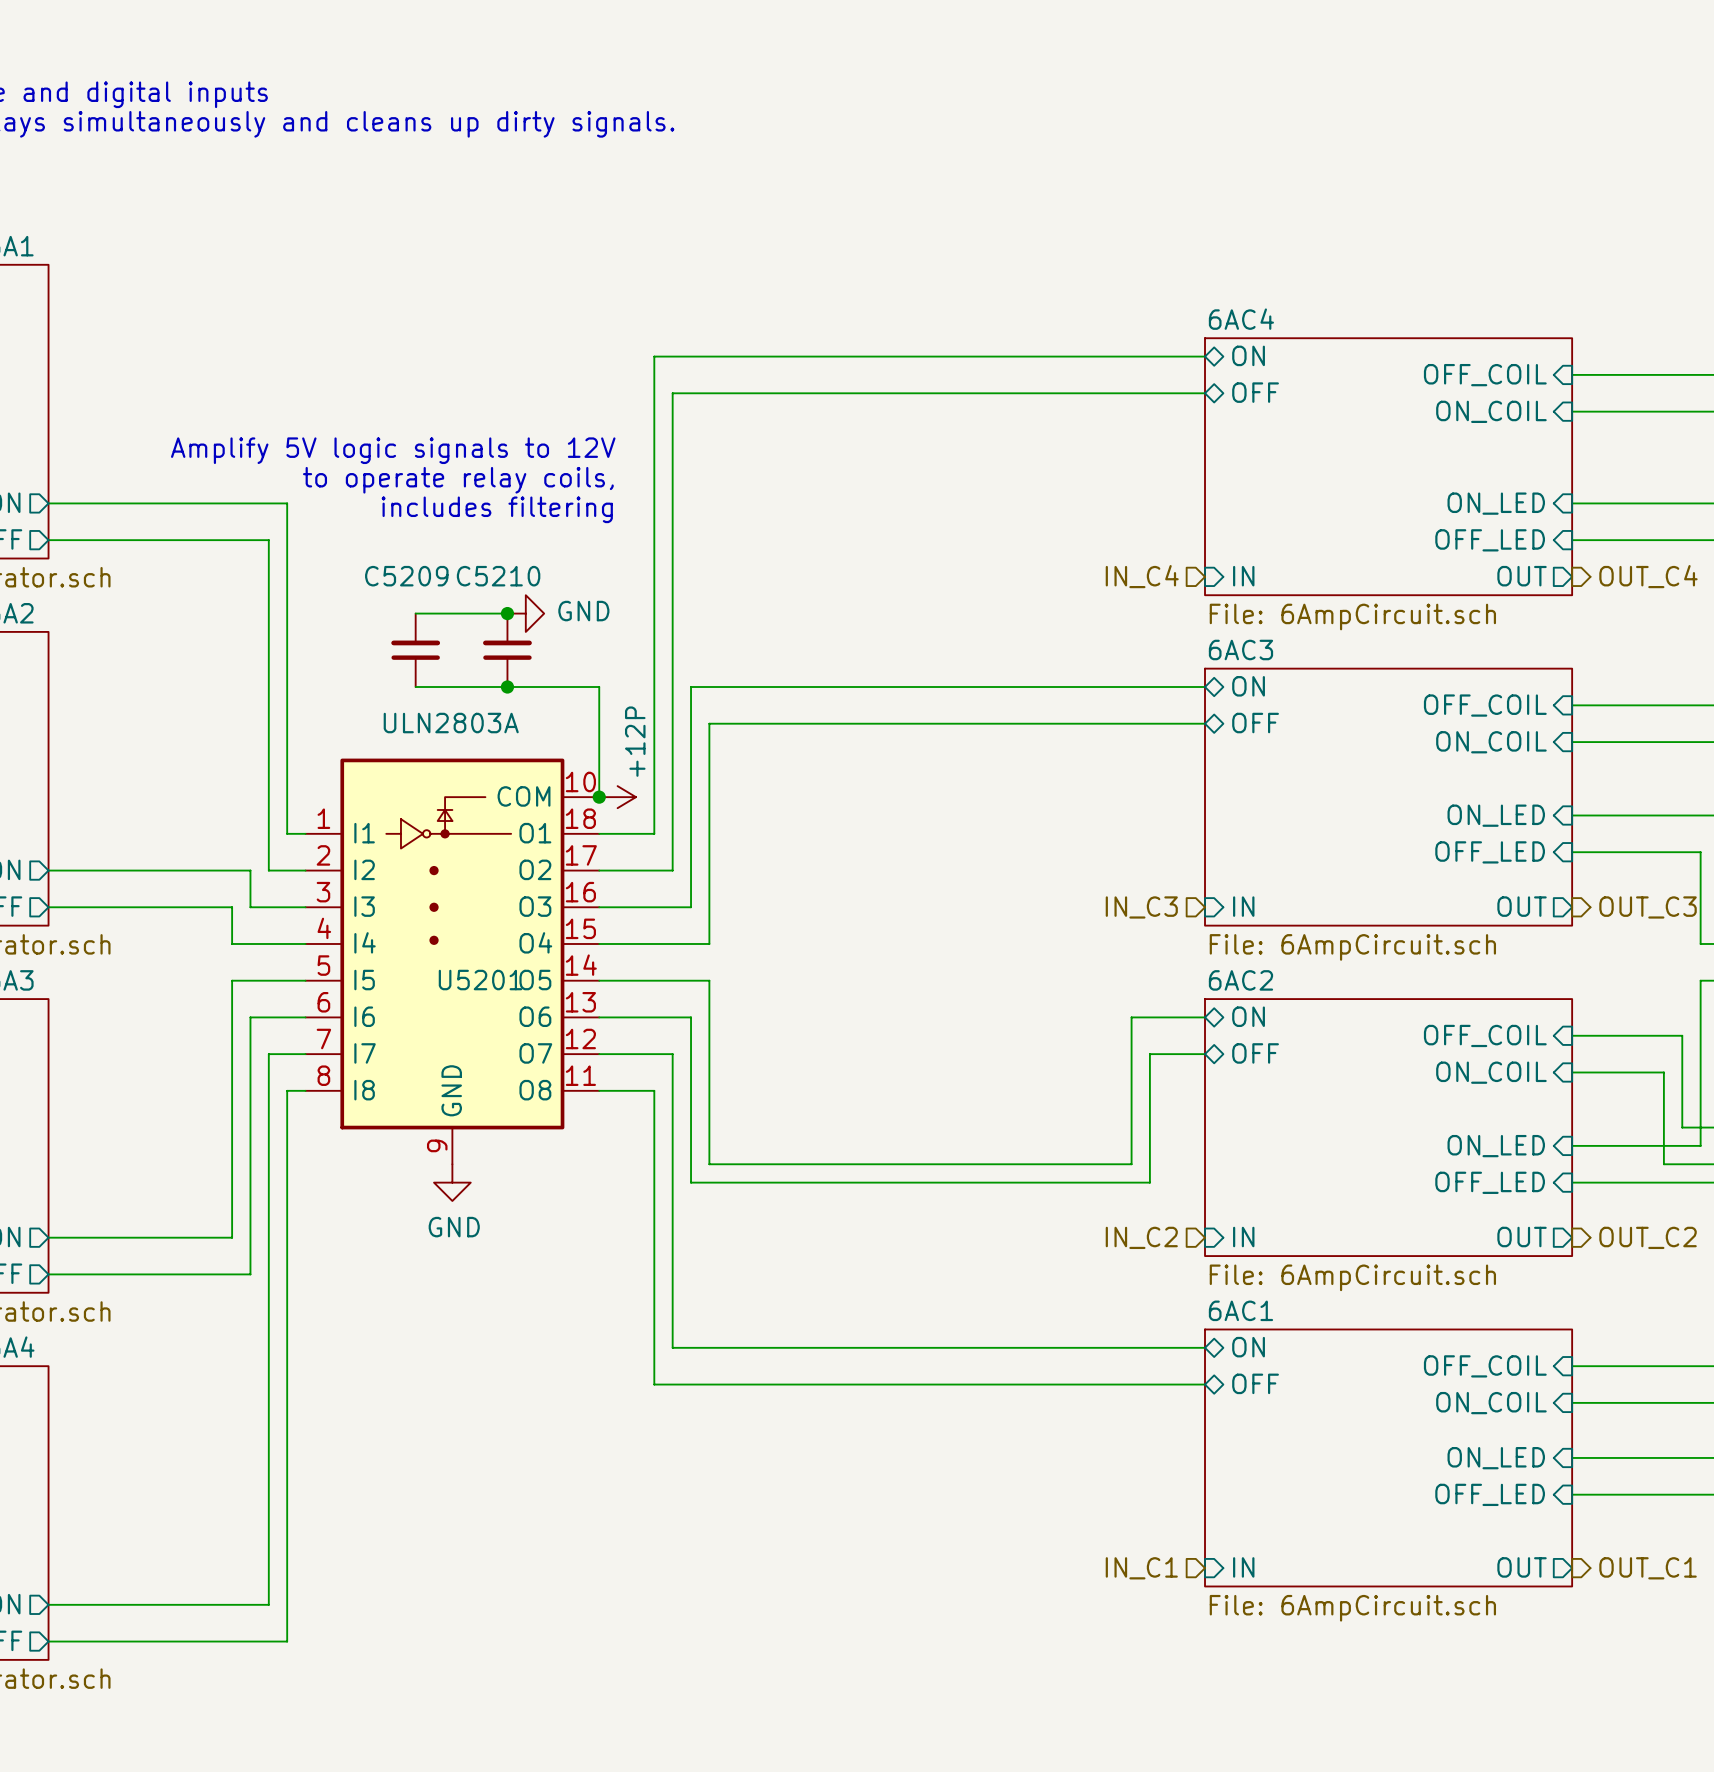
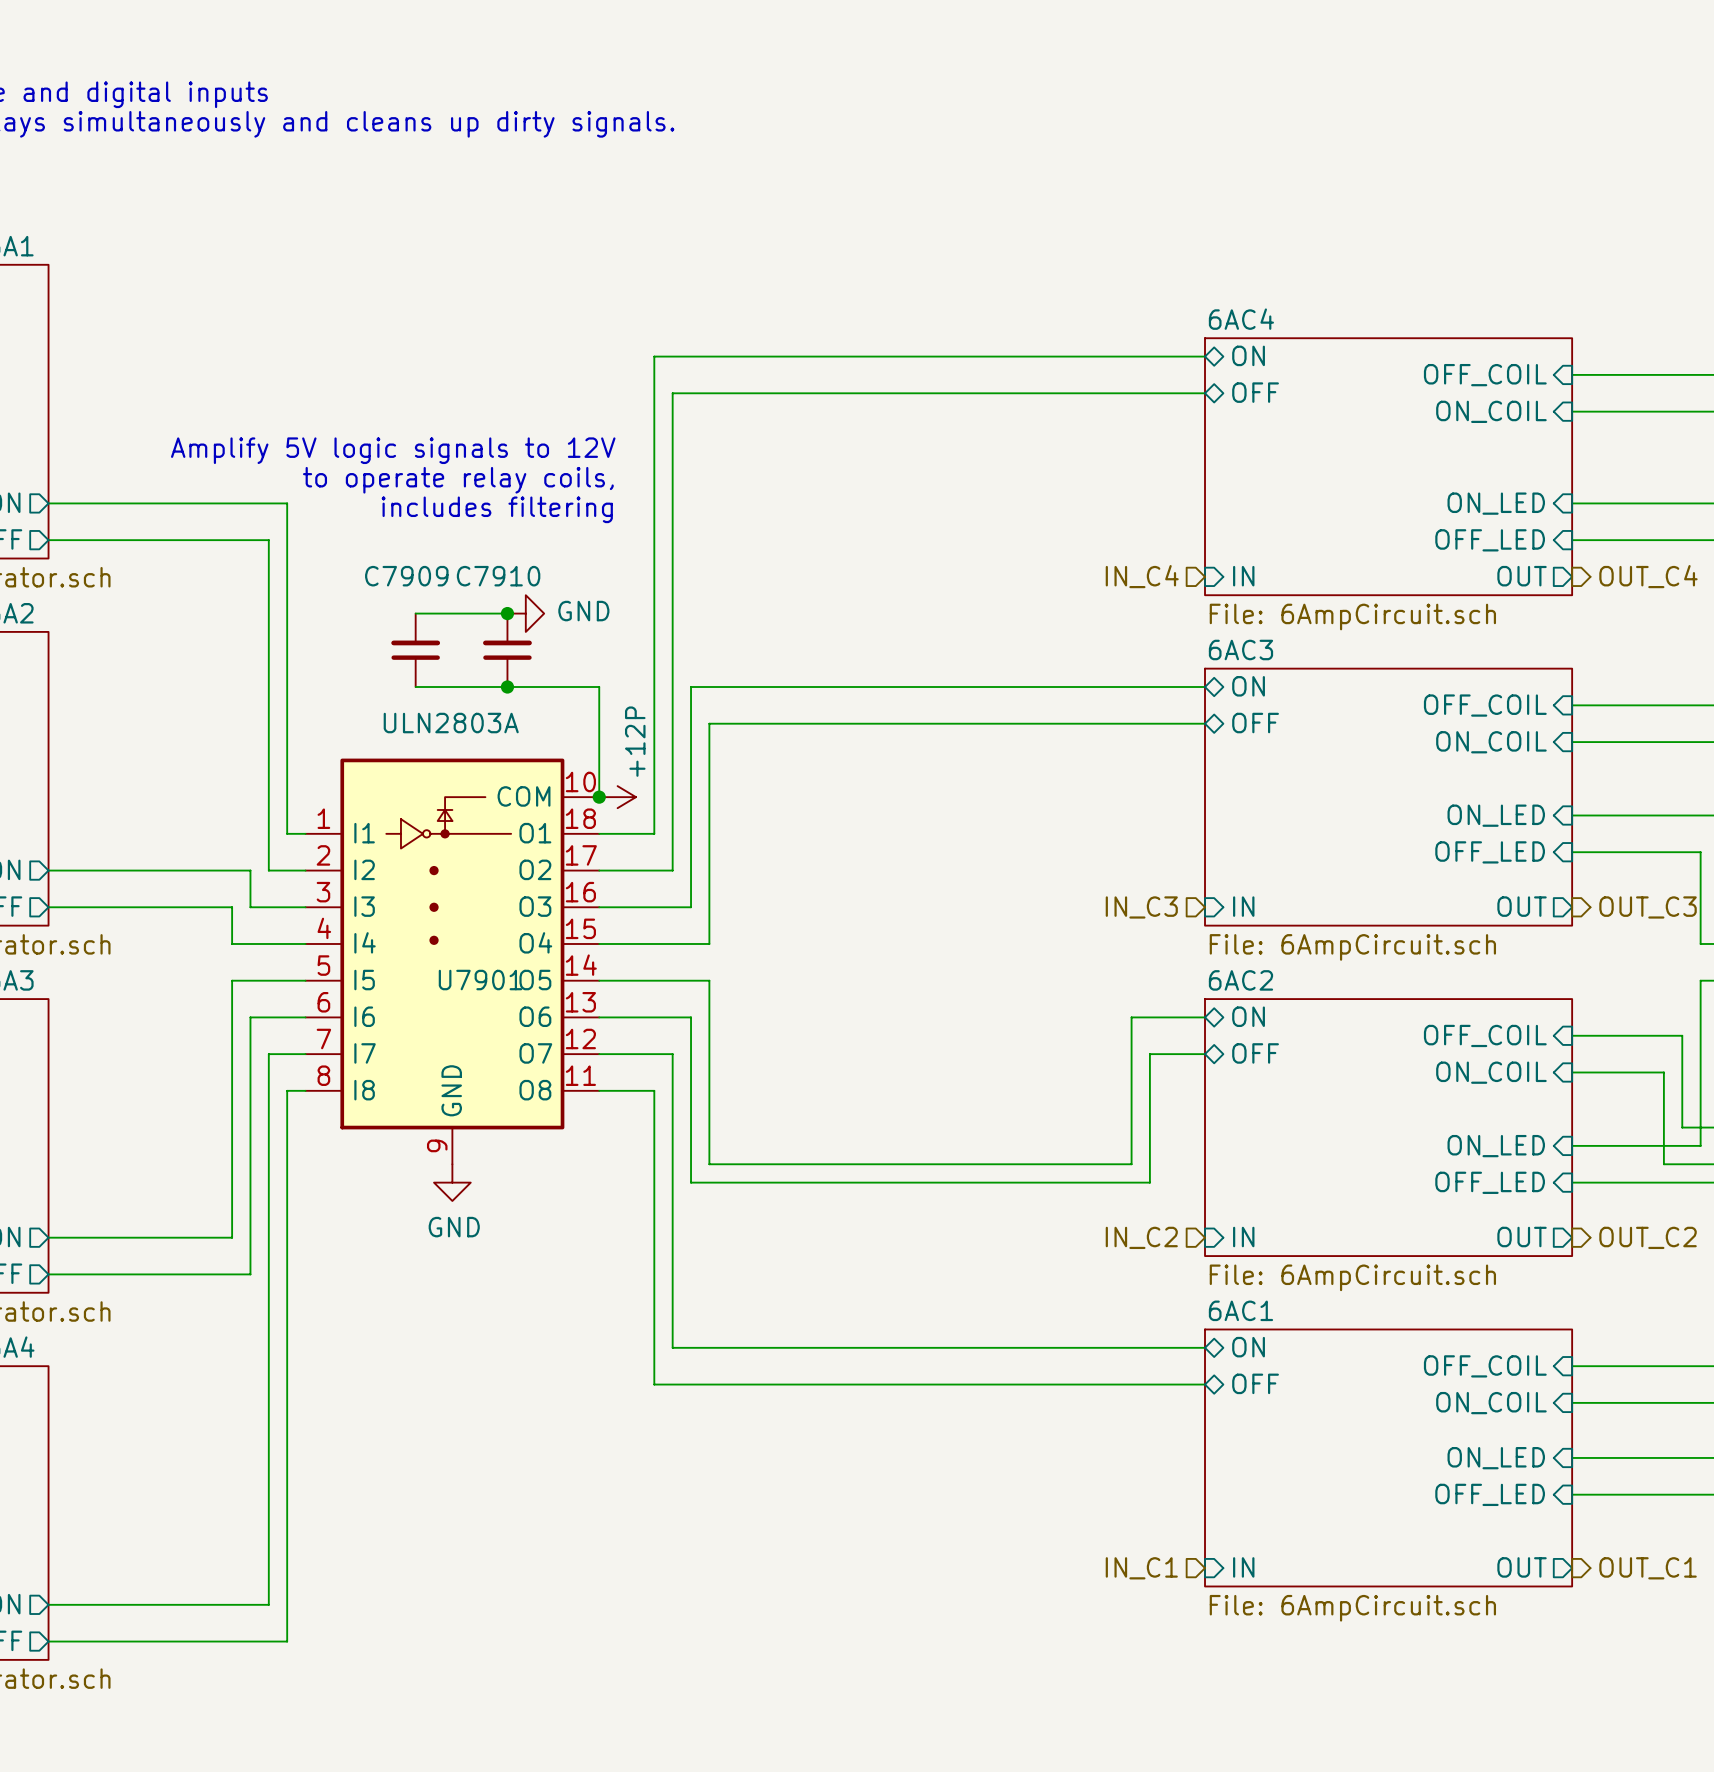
C5209 name: C5209 (406, 576) -> C7909 (406, 576)
C5210 name: C5210 (498, 576) -> C7910 (498, 576)
U5201 name: U5201 (480, 980) -> U7901 (480, 980)

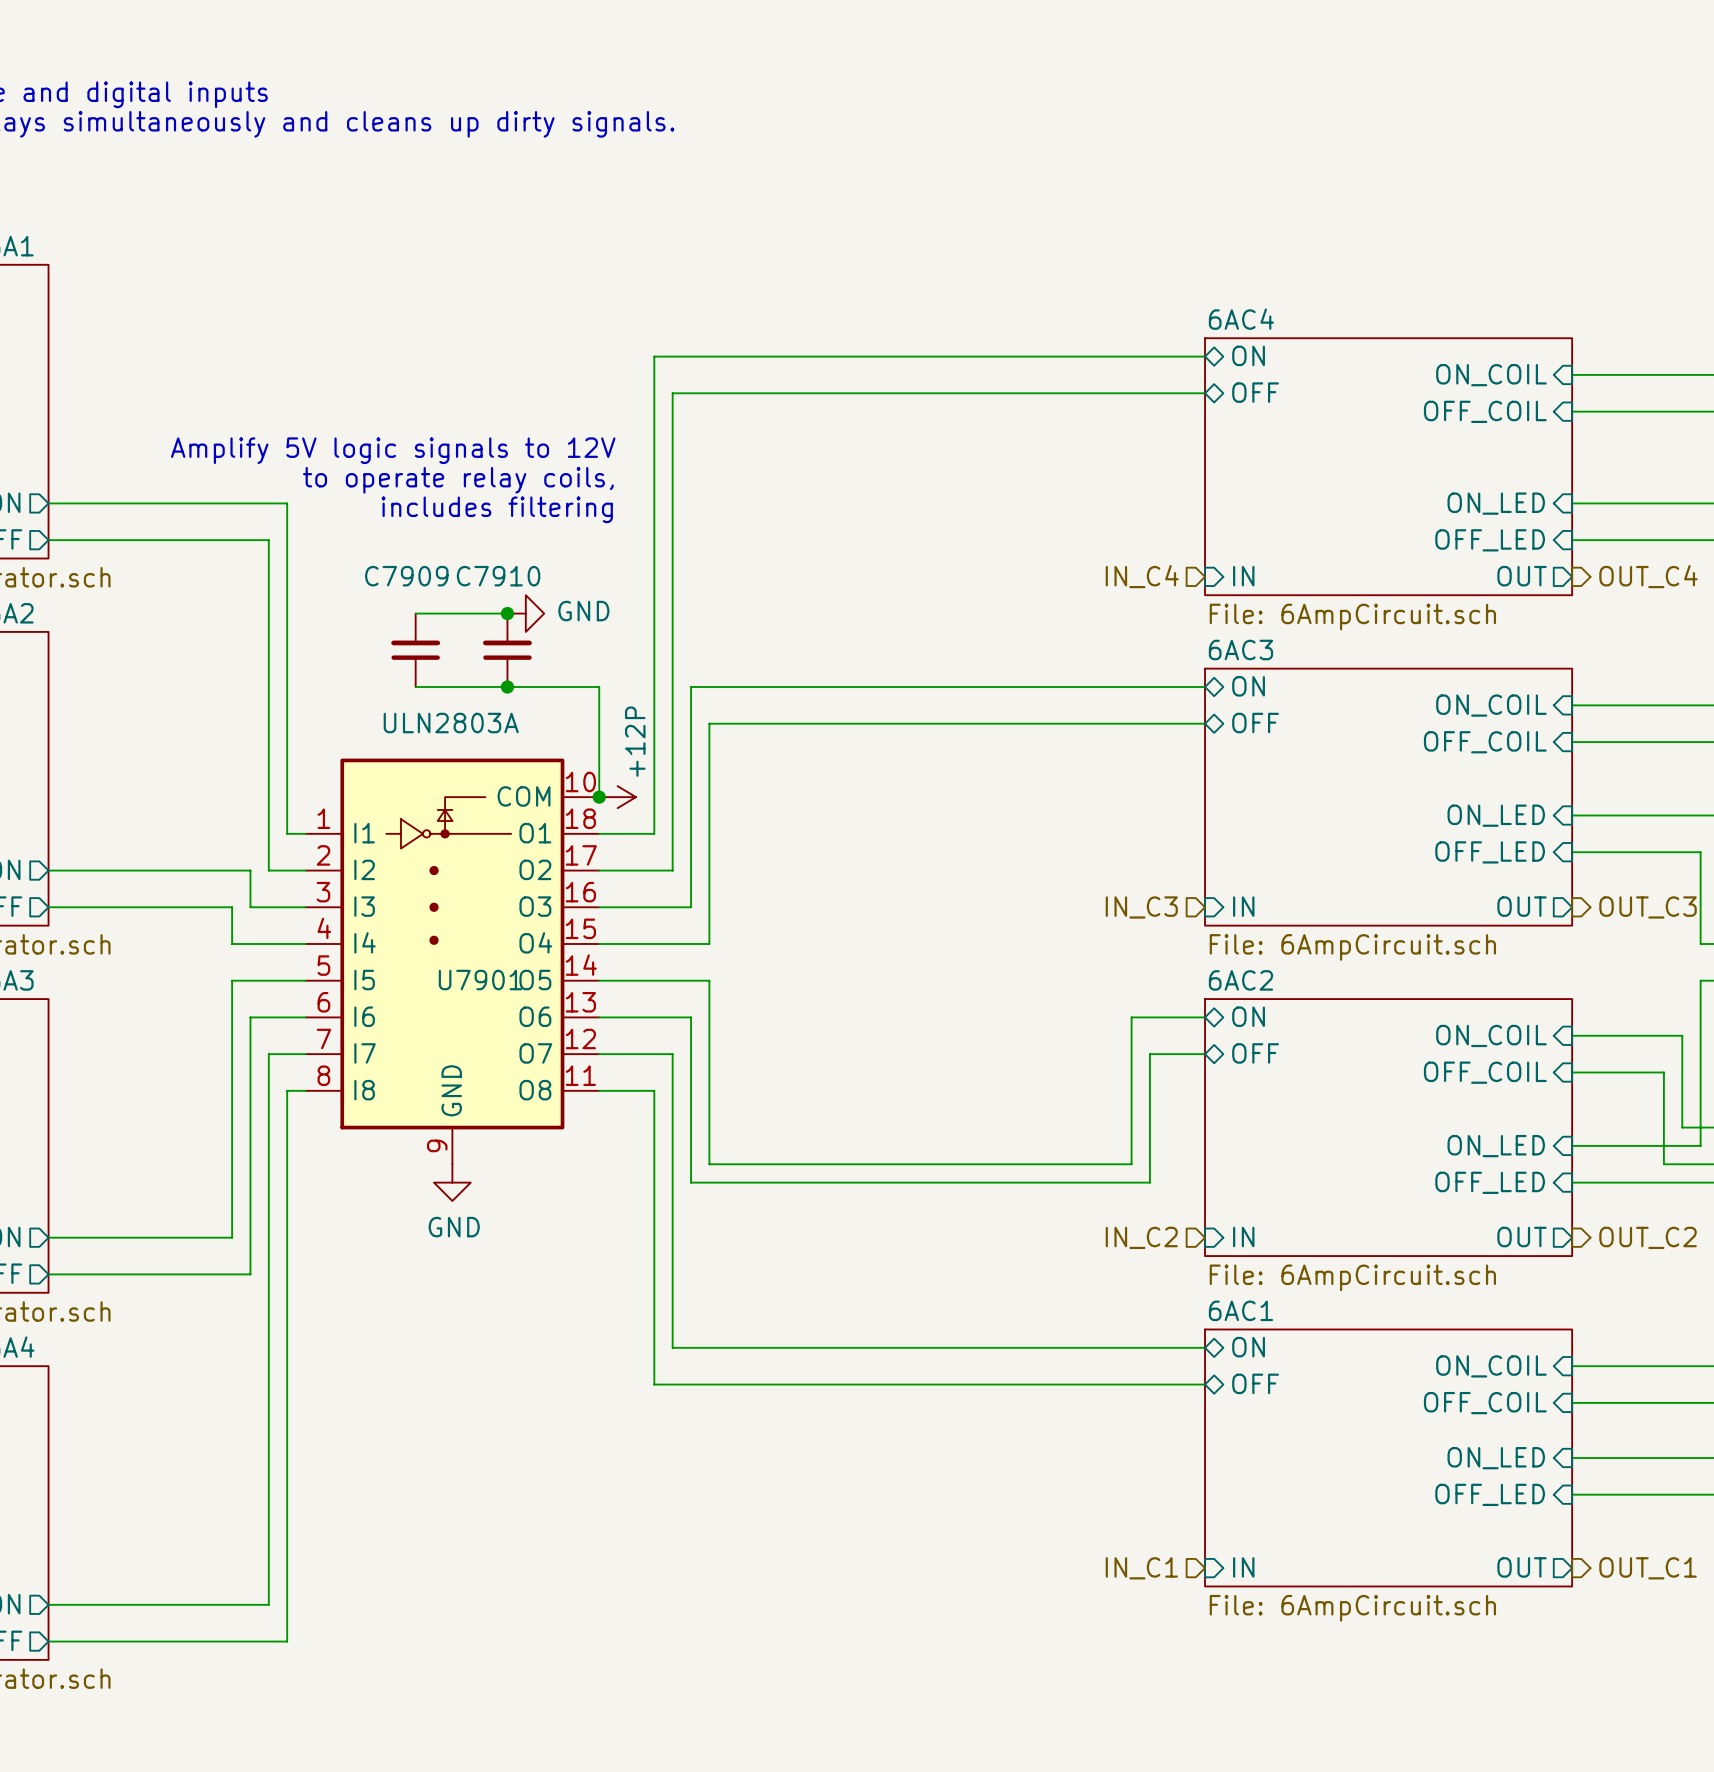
sheet pin: OFF_COIL (1485, 375) -> ON_COIL (1491, 375)
sheet pin: ON_COIL (1491, 411) -> OFF_COIL (1485, 411)
sheet pin: OFF_COIL (1485, 705) -> ON_COIL (1491, 705)
sheet pin: ON_COIL (1491, 742) -> OFF_COIL (1485, 742)
sheet pin: OFF_COIL (1485, 1035) -> ON_COIL (1491, 1035)
sheet pin: ON_COIL (1491, 1072) -> OFF_COIL (1485, 1072)
sheet pin: OFF_COIL (1485, 1366) -> ON_COIL (1491, 1366)
sheet pin: ON_COIL (1491, 1403) -> OFF_COIL (1485, 1403)

